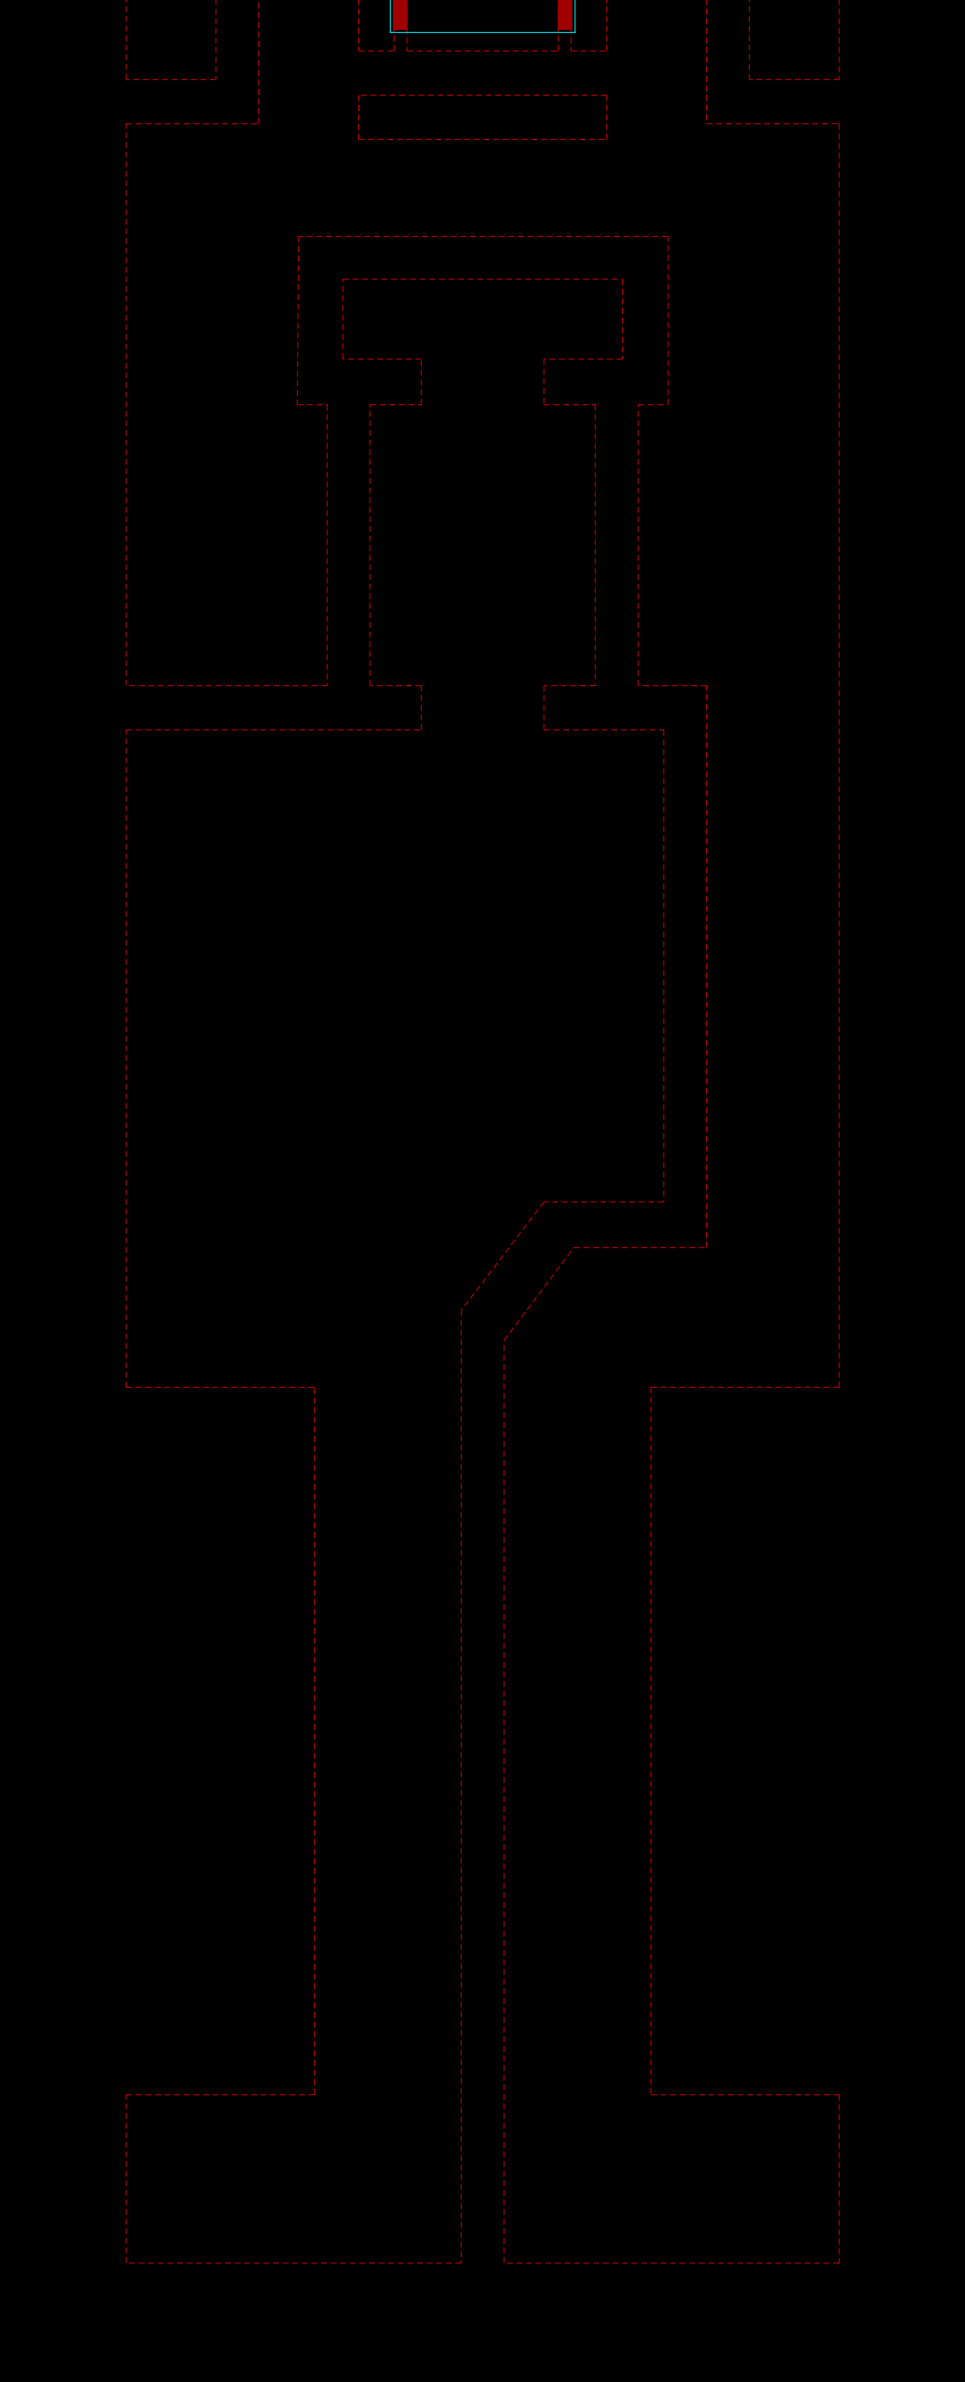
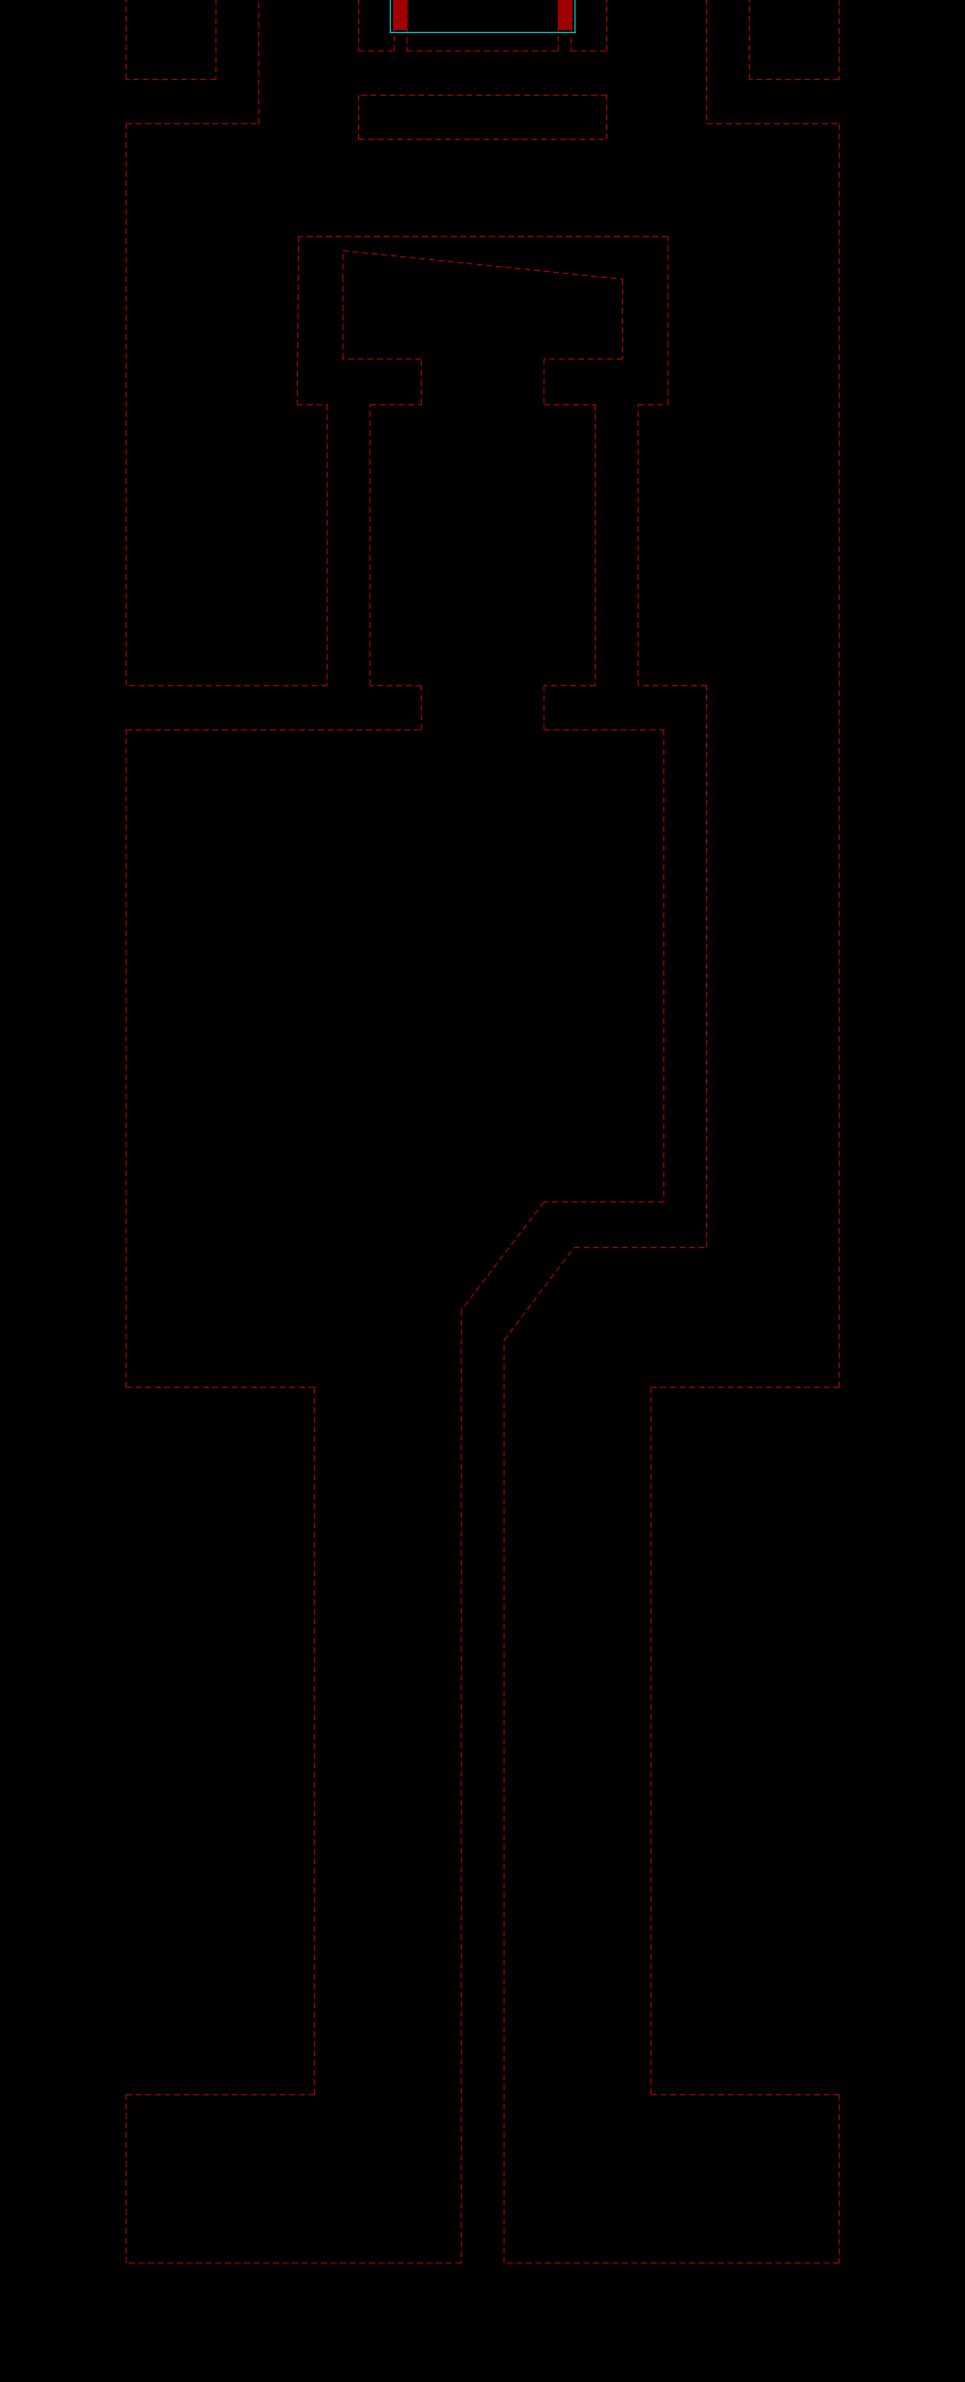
top zone outline: (342, 279) (622, 279) -> (342, 279) (342, 250) (622, 279)

